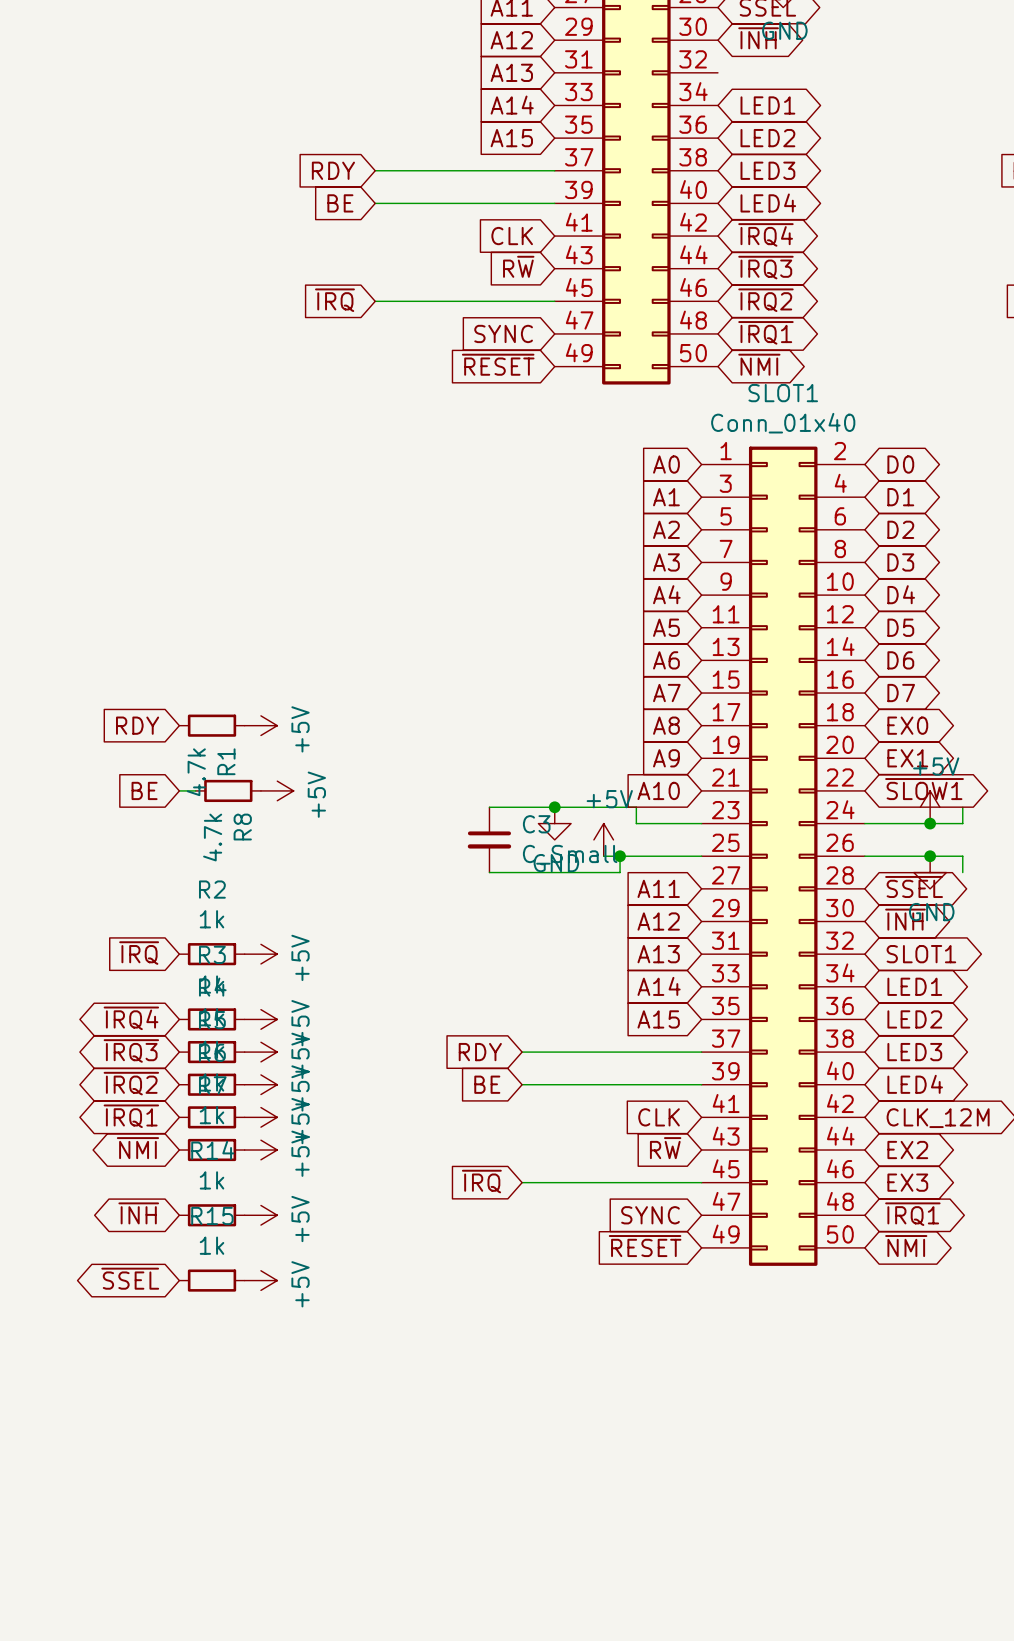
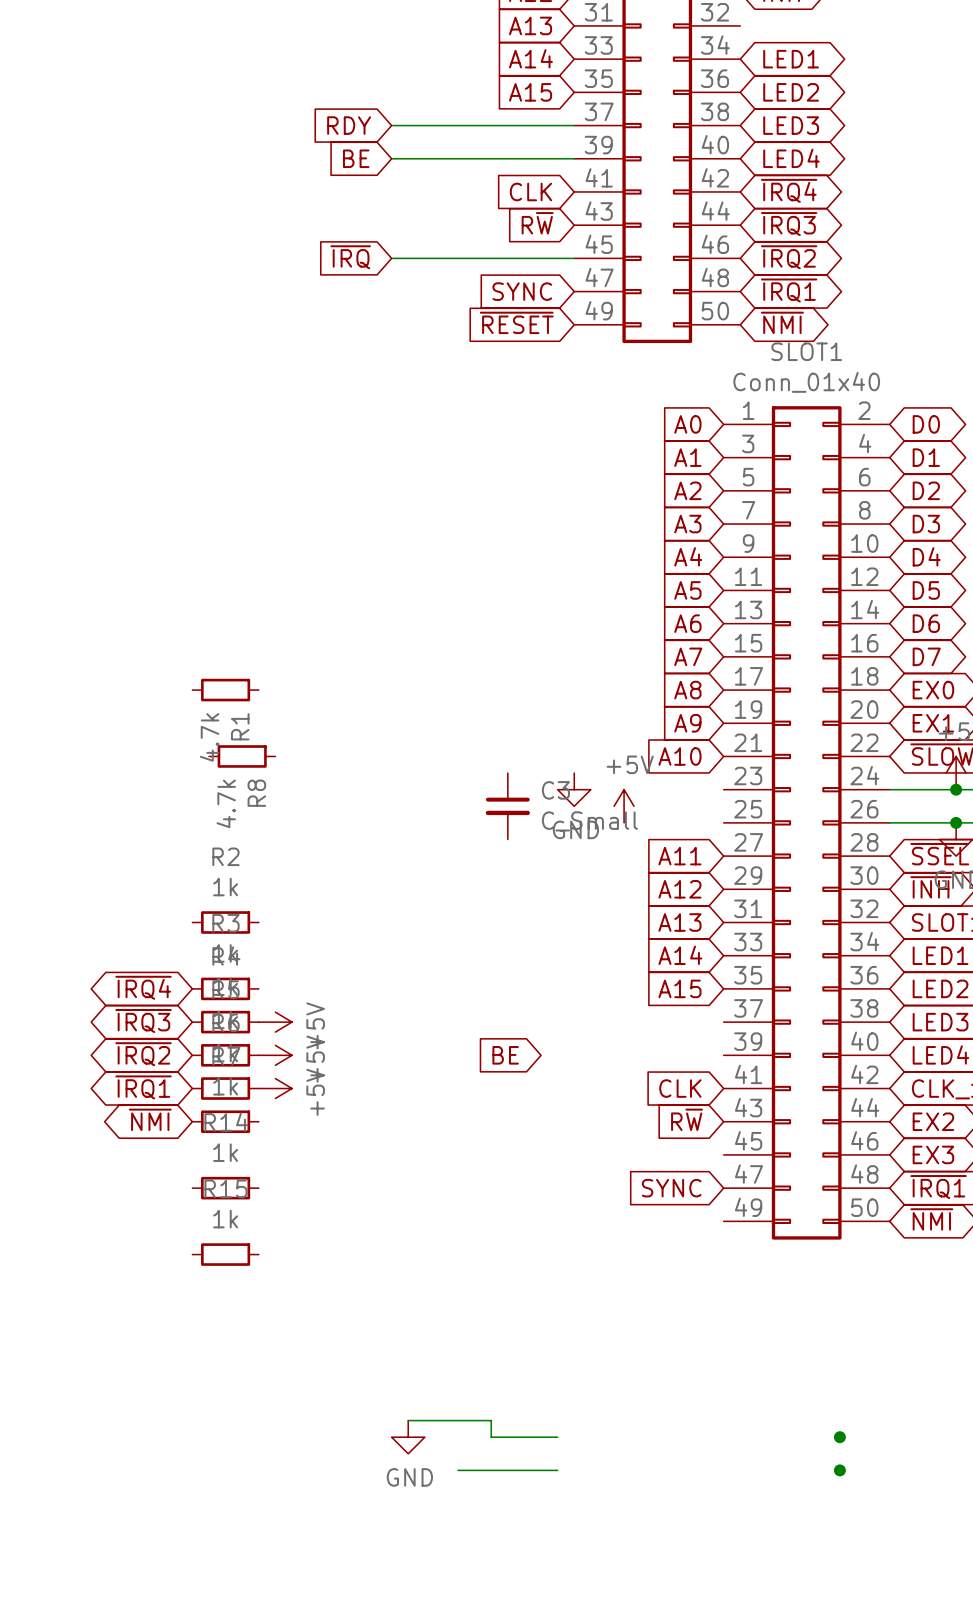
global label: RDY (137, 725) -> none
power symbol: +5V (260, 725) -> none
global label: BE (144, 790) -> none
wire: (179, 790) (195, 790) -> none
power symbol: +5V (277, 790) -> none
wire: (489, 807) (636, 807) (636, 823) (701, 823) -> none
junction: (554, 807) -> none
wire: (603, 856) (701, 856) -> none
wire: (620, 856) (620, 872) (489, 872) -> none
junction: (620, 856) -> none
global label: ~{IRQ} (139, 953) -> none
power symbol: +5V (260, 954) -> none
power symbol: +5V (260, 1019) -> none
global label: RDY (480, 1052) -> none
wire: (522, 1052) (701, 1052) -> none
wire: (522, 1084) (701, 1084) -> none
power symbol: +5V (260, 1150) -> none
global label: ~{IRQ} (481, 1181) -> none
wire: (522, 1182) (701, 1182) -> none
global label: ~{INH} (138, 1213) -> none
power symbol: +5V (260, 1215) -> none
global label: ~{RESET} (645, 1246) -> none
global label: ~{SSEL} (130, 1278) -> none
power symbol: +5V (260, 1280) -> none
wire: none -> (408, 1420) (491, 1420) (491, 1437) (557, 1437)
power symbol: none -> GND (408, 1437)
junction: none -> (839, 1437)
wire: none -> (458, 1470) (557, 1470)
junction: none -> (839, 1470)

